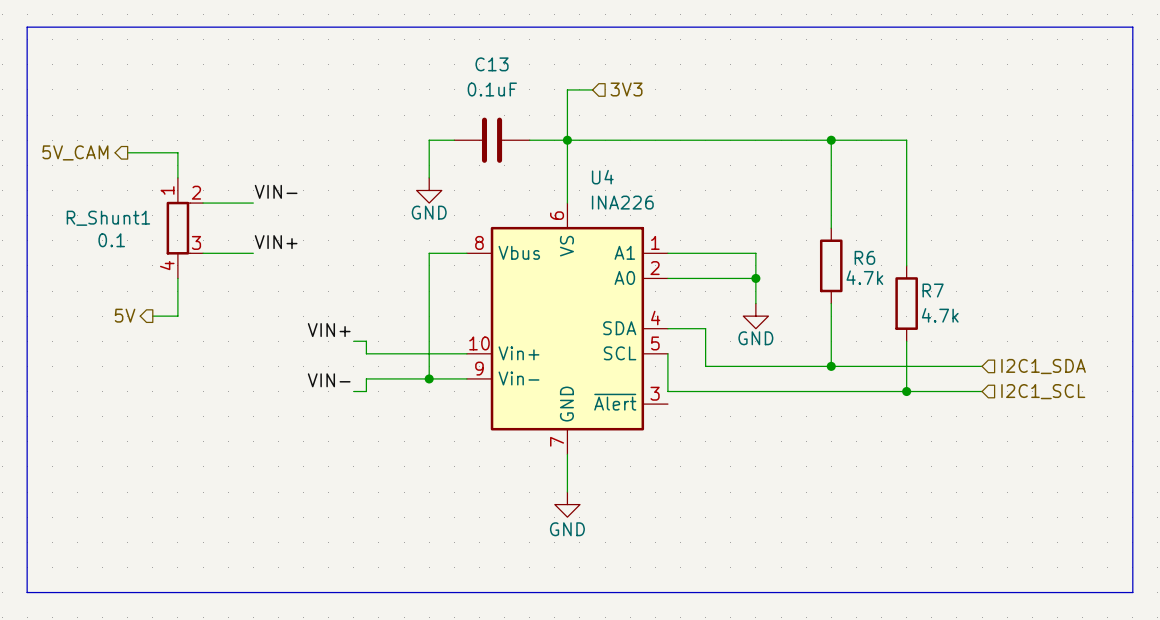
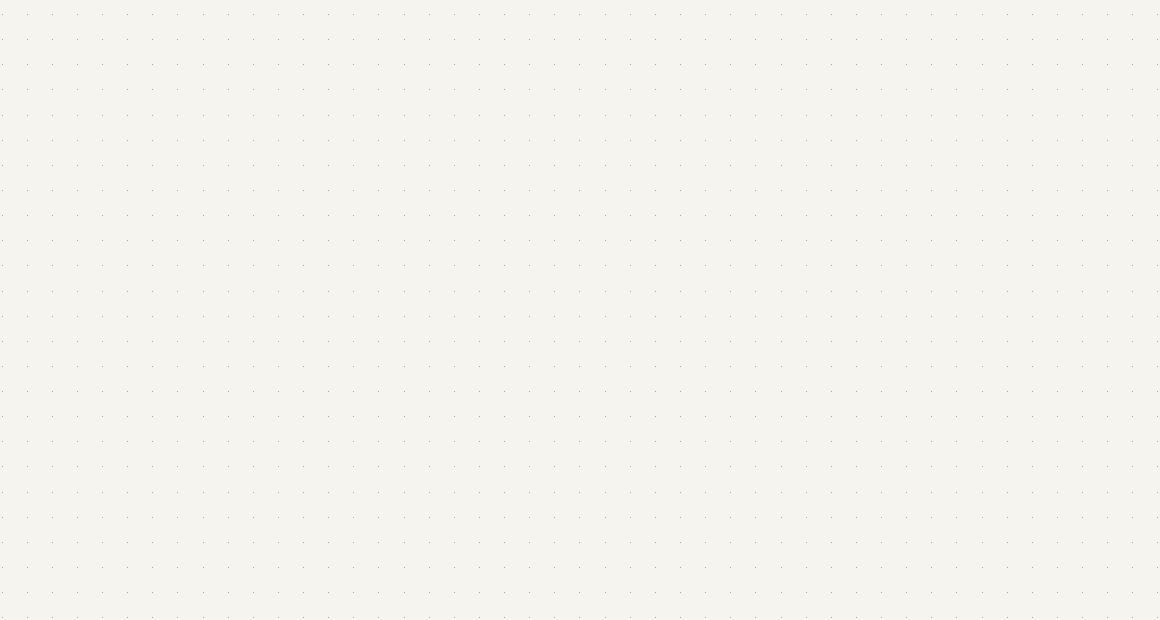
line: (27, 27) (1132, 27) (1132, 592) (27, 592) (27, 27) -> none
wire: (592, 89) (567, 89) (567, 203) -> none
hierarchical label: 3V3 (626, 89) -> none
wire: (454, 140) (429, 140) (429, 177) -> none
C13: 0.1uF (492, 140) -> none
wire: (529, 140) (906, 140) (906, 265) -> none
junction: (567, 140) -> none
wire: (831, 140) (831, 228) -> none
junction: (831, 140) -> none
hierarchical label: 5V_CAM (75, 152) -> none
wire: (127, 152) (177, 152) (177, 177) -> none
power symbol: GND (429, 190) -> none
label: VIN- (276, 191) -> none
wire: (203, 203) (253, 203) -> none
0.1: R_Shunt1 (184, 228) -> none
label: VIN+ (276, 242) -> none
wire: (203, 253) (253, 253) -> none
wire: (466, 253) (429, 253) (429, 378) -> none
wire: (667, 253) (755, 253) (755, 303) -> none
R6: 4.7k (831, 265) -> none
wire: (177, 278) (177, 316) (152, 316) -> none
wire: (667, 278) (755, 278) -> none
junction: (755, 278) -> none
wire: (831, 303) (831, 366) -> none
R7: 4.7k (906, 303) -> none
hierarchical label: 5V (125, 315) -> none
power symbol: GND (755, 316) -> none
U4: INA226 (567, 328) -> none
wire: (667, 328) (705, 328) (705, 366) (982, 366) -> none
label: VIN+ (329, 330) -> none
wire: (353, 341) (366, 341) (366, 353) (466, 353) -> none
wire: (906, 341) (906, 391) -> none
wire: (667, 353) (667, 391) (982, 391) -> none
junction: (831, 366) -> none
hierarchical label: I2C1_SDA (1043, 366) -> none
junction: (429, 378) -> none
wire: (466, 378) (366, 378) (366, 391) (353, 391) -> none
label: VIN- (329, 380) -> none
junction: (906, 391) -> none
hierarchical label: I2C1_SCL (1043, 391) -> none
wire: (567, 454) (567, 492) -> none
power symbol: GND (567, 504) -> none

